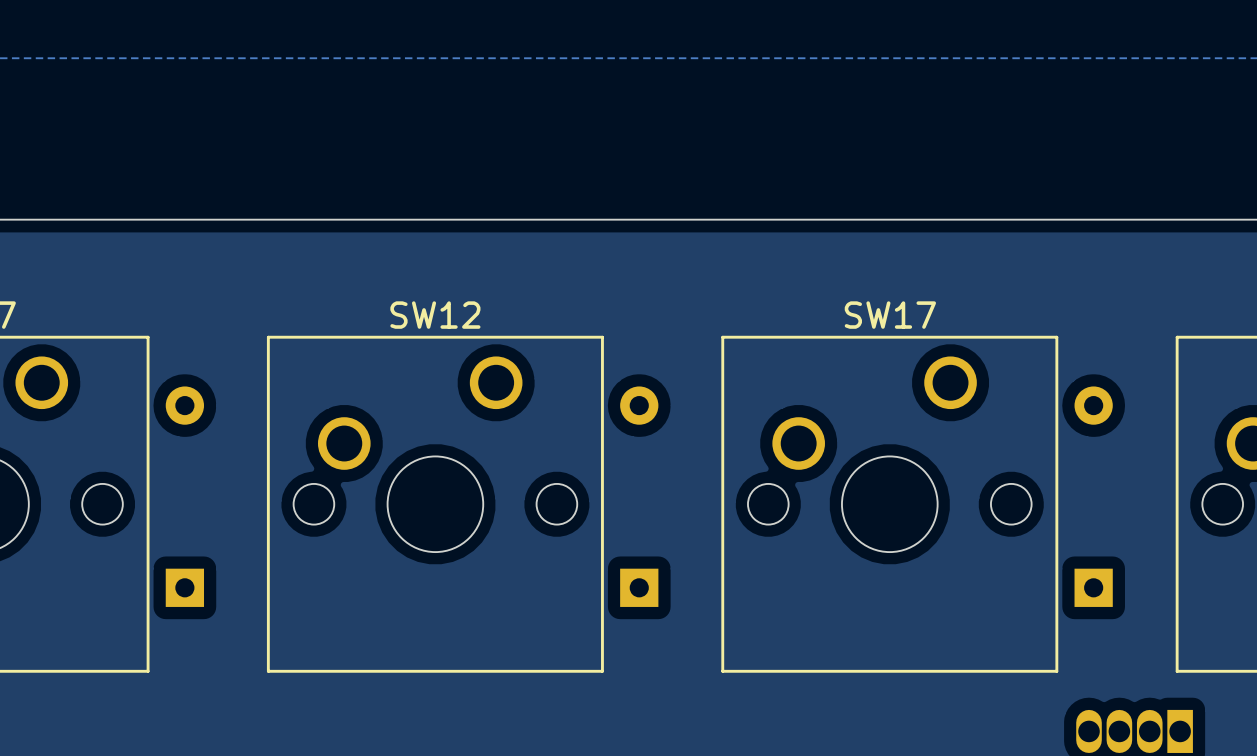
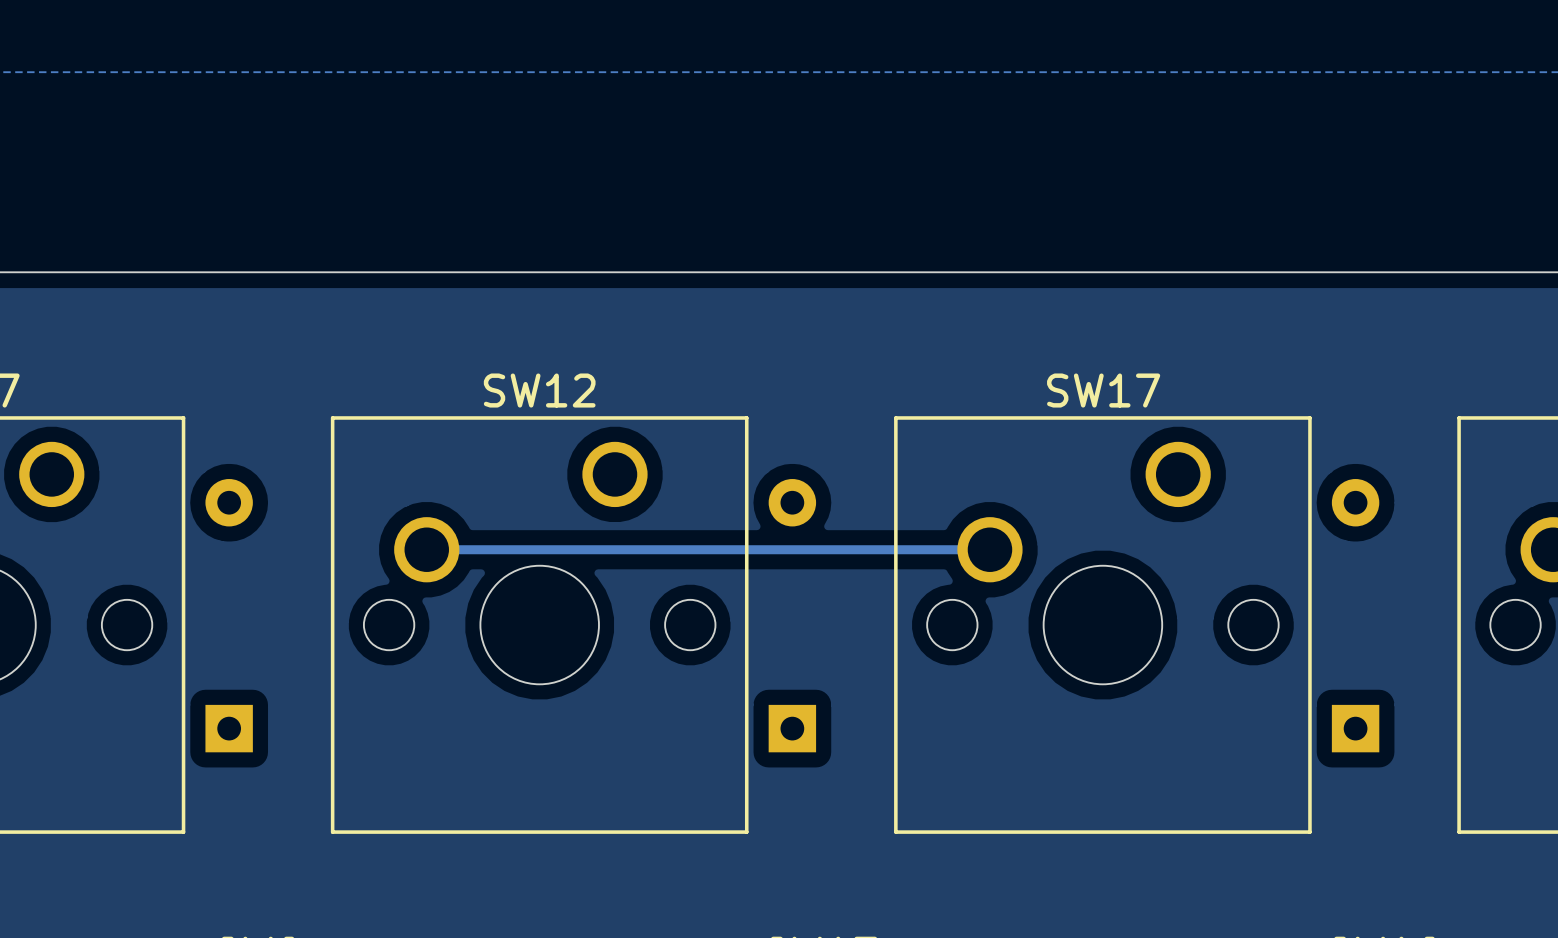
track: none -> (989, 549) (426, 549)
part: (1134, 731) -> none

